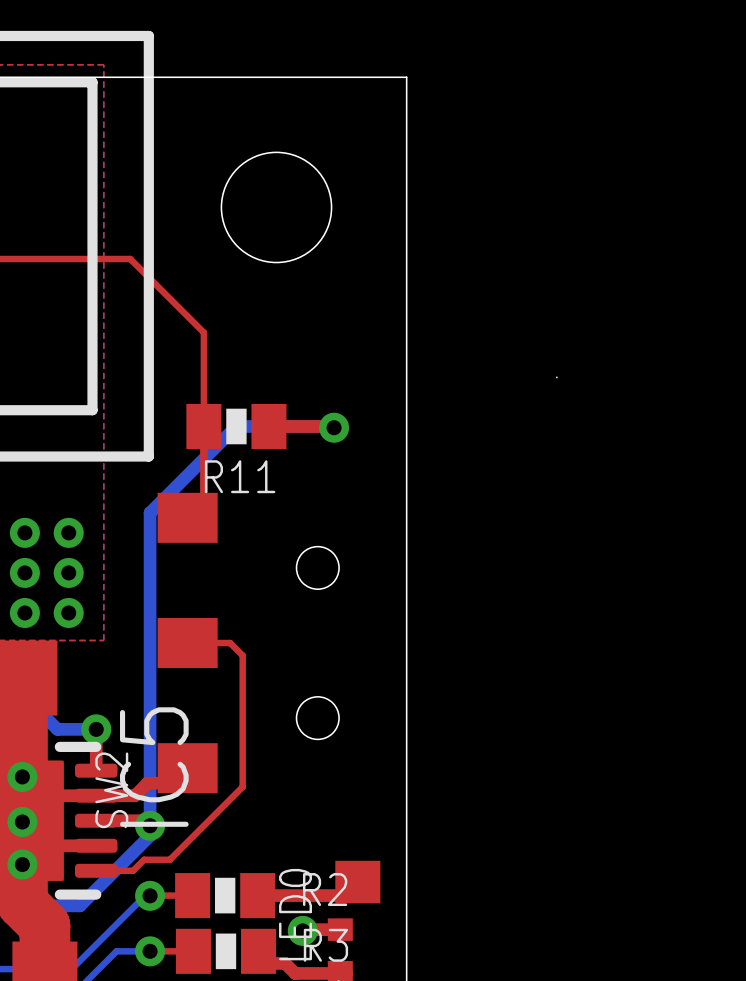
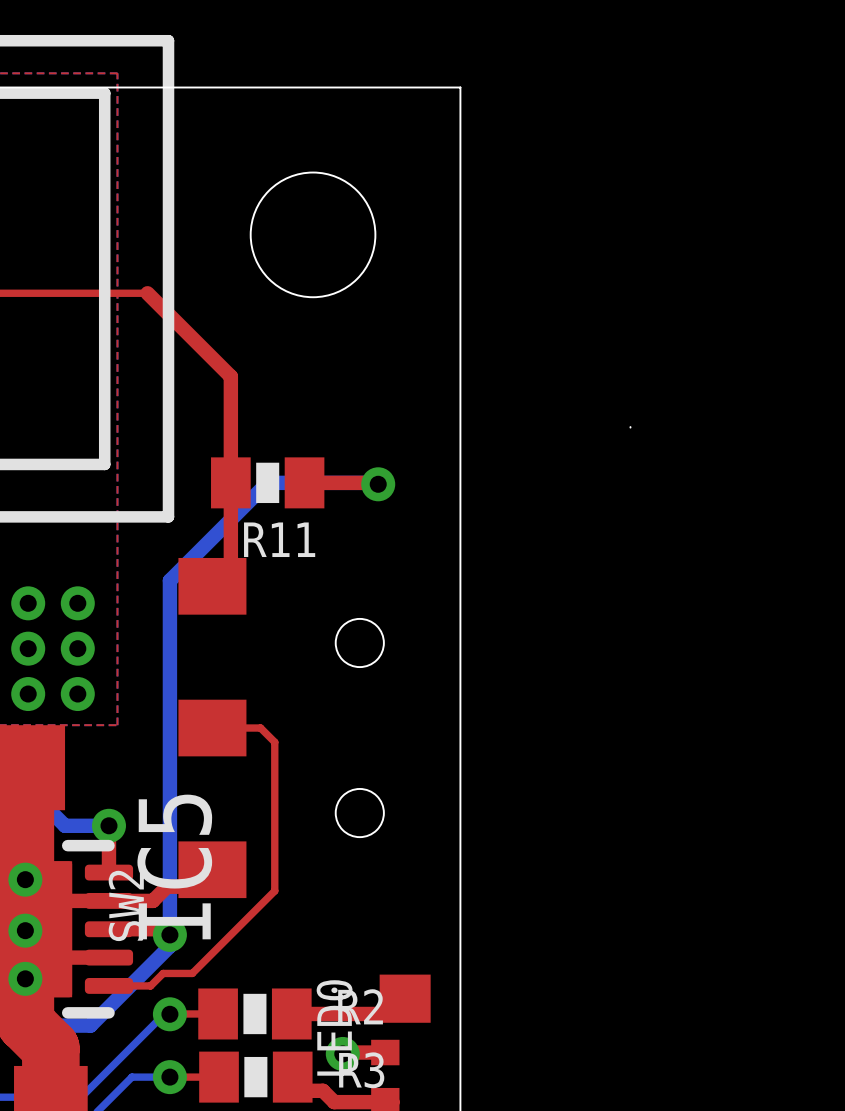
top track width: thin (130, 259) (203, 332) (203, 501) -> thick (147, 293) (230, 376) (230, 567)

